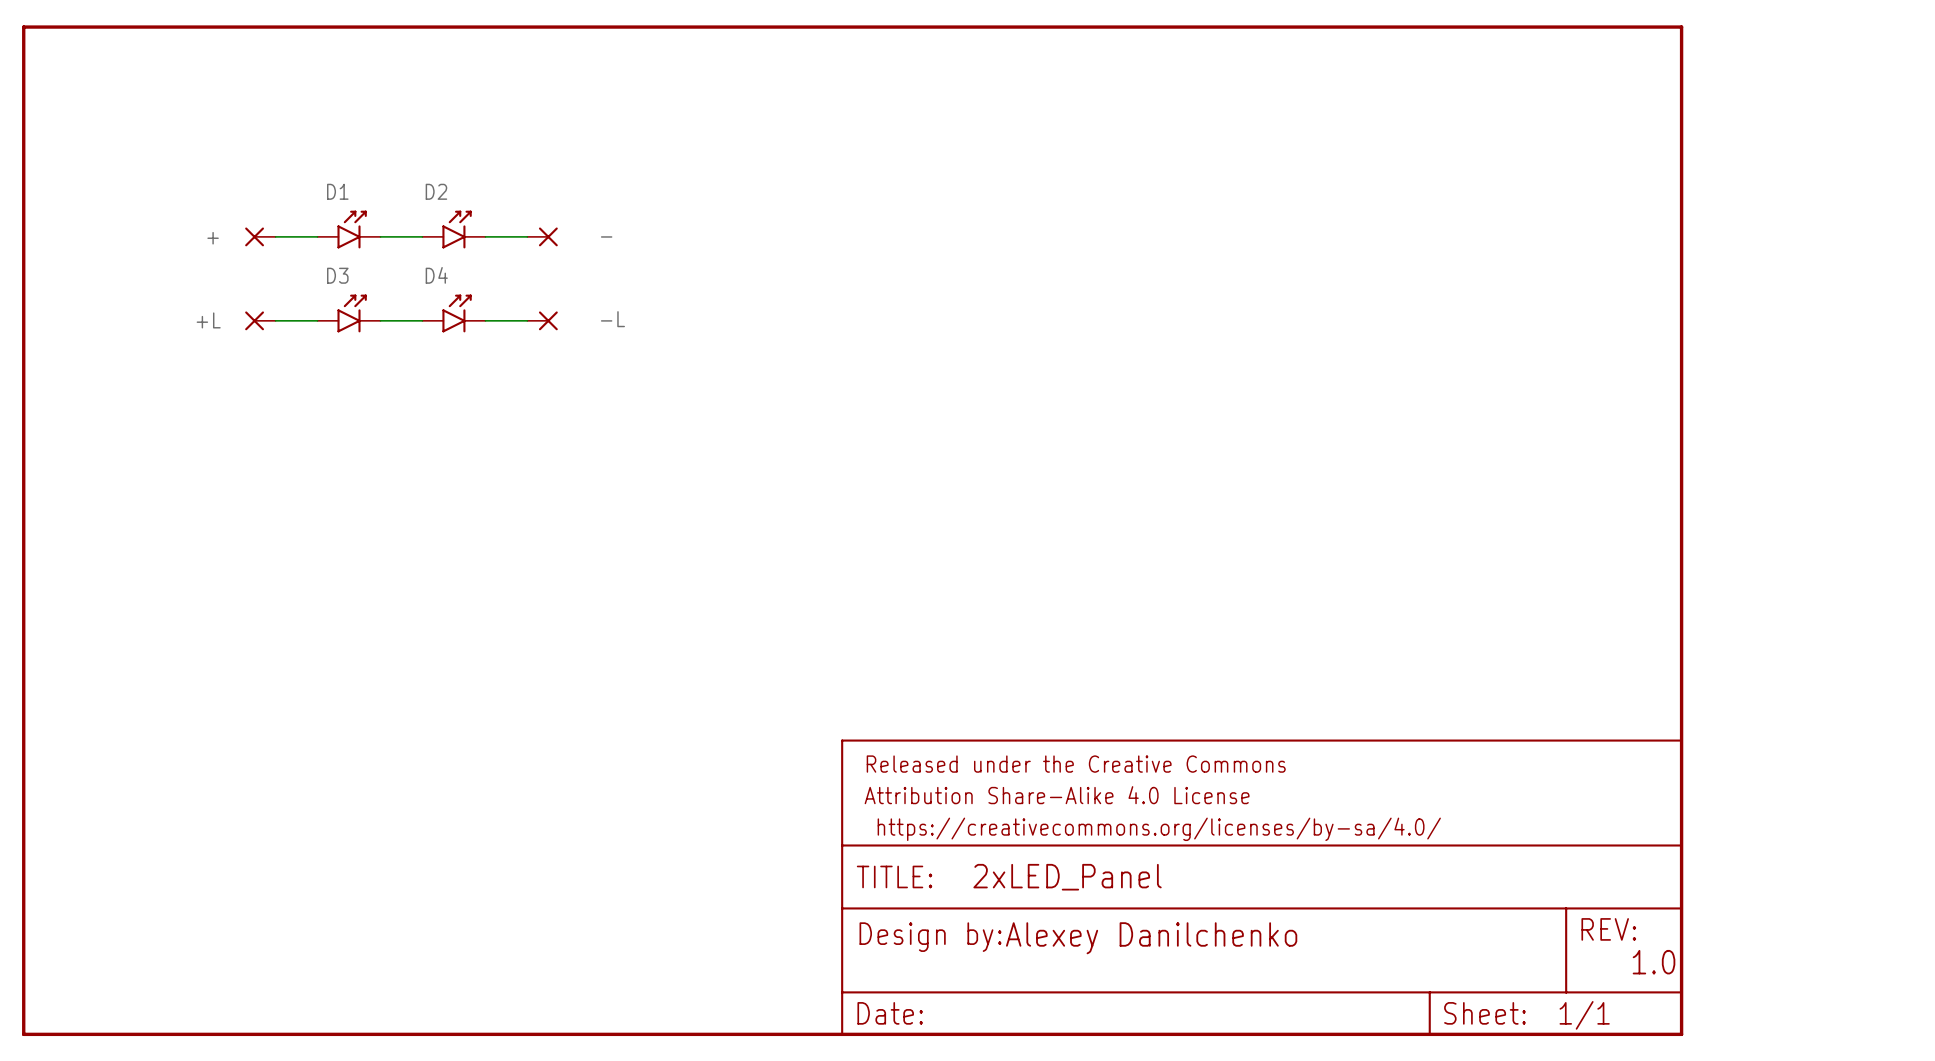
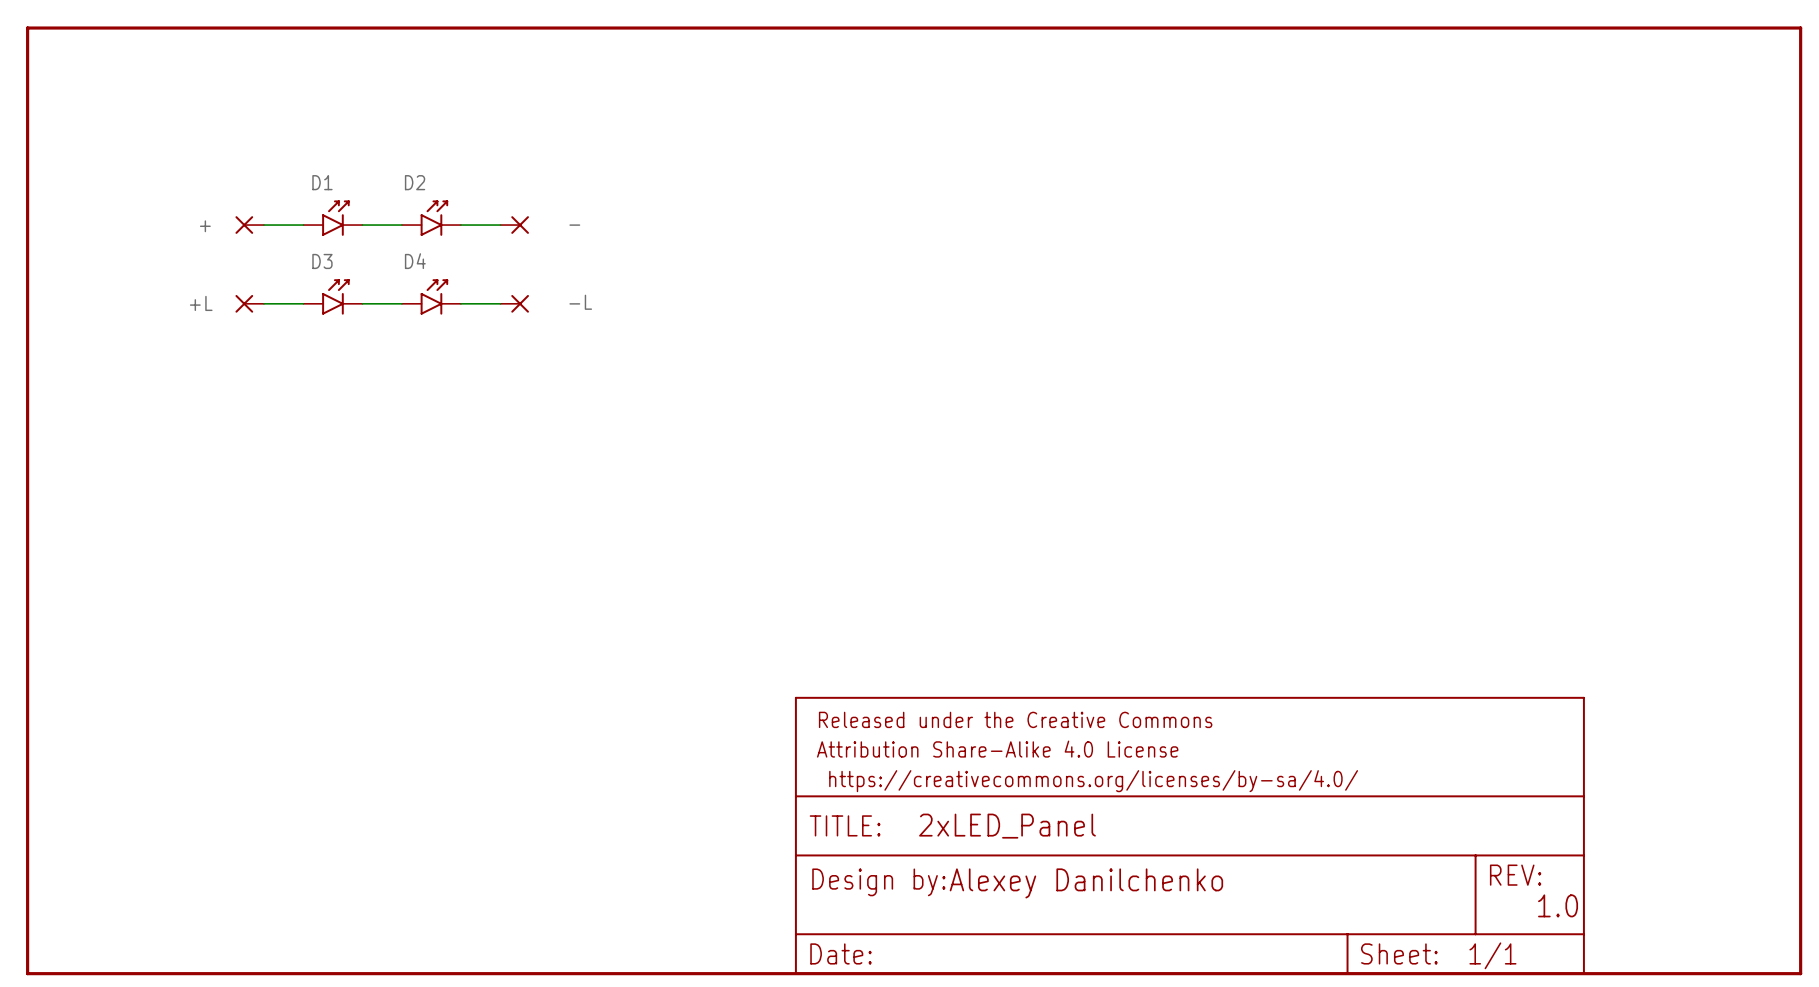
part: (852, 530) -> none
part: none -> (914, 500)

